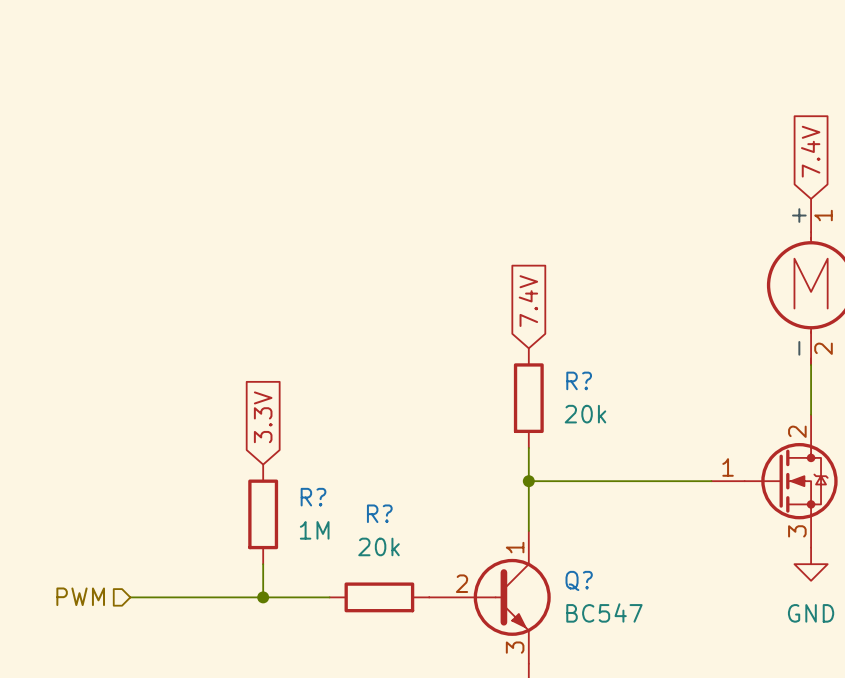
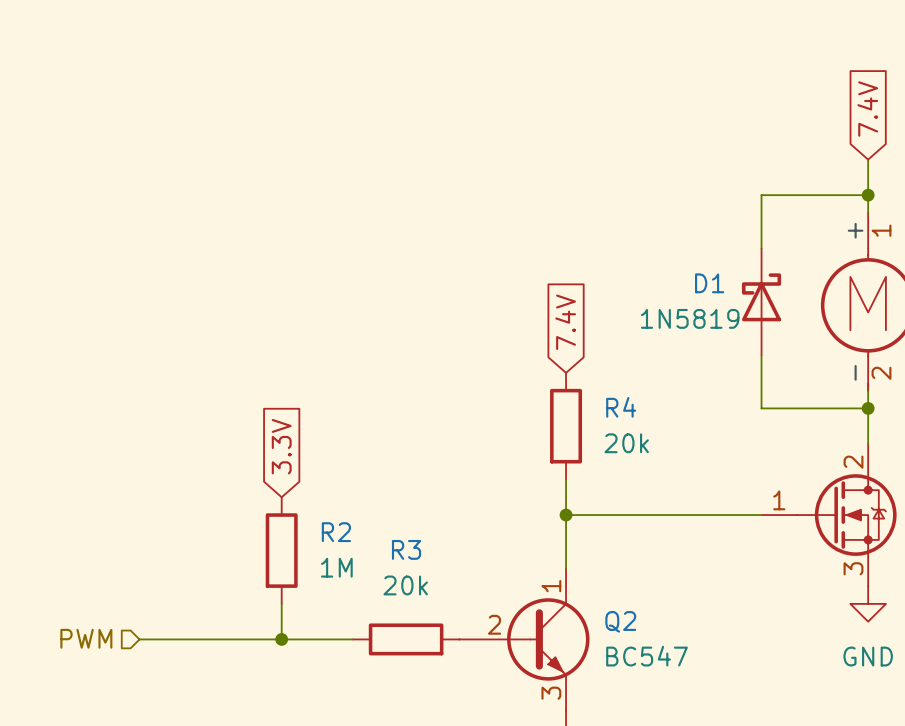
wire: none -> (868, 159) (868, 212)
global label position: 7.4V (810, 151) -> 7.4V (867, 109)
wire: none -> (868, 195) (761, 195) (761, 248)
junction: none -> (868, 195)
D1: none -> 1N5819 (761, 301)
wire: none -> (761, 355) (761, 408) (868, 408)
R? name: R? (579, 380) -> R4 (621, 407)
junction: none -> (868, 408)
R? name: R? (313, 497) -> R2 (336, 532)
R? name: R? (379, 513) -> R3 (406, 549)
Q? name: Q? (579, 580) -> Q2 (620, 621)

